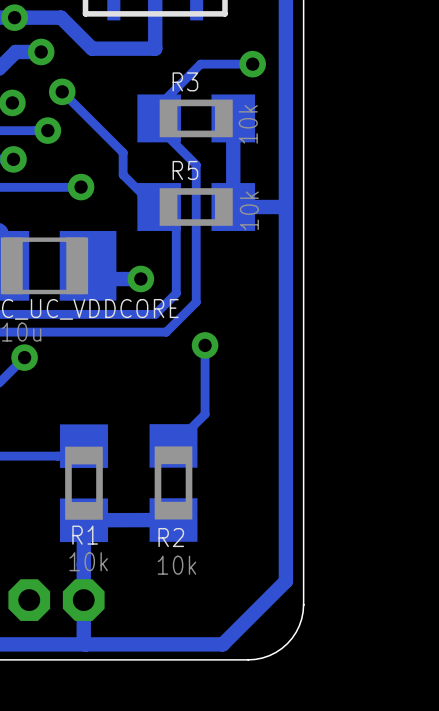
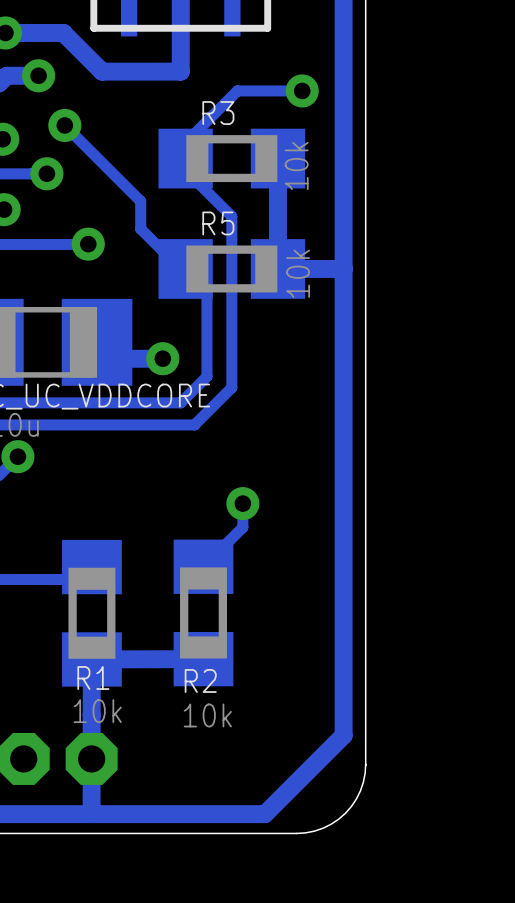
track: (205, 345) (205, 395) -> none
via position: (205, 345) -> (242, 503)

